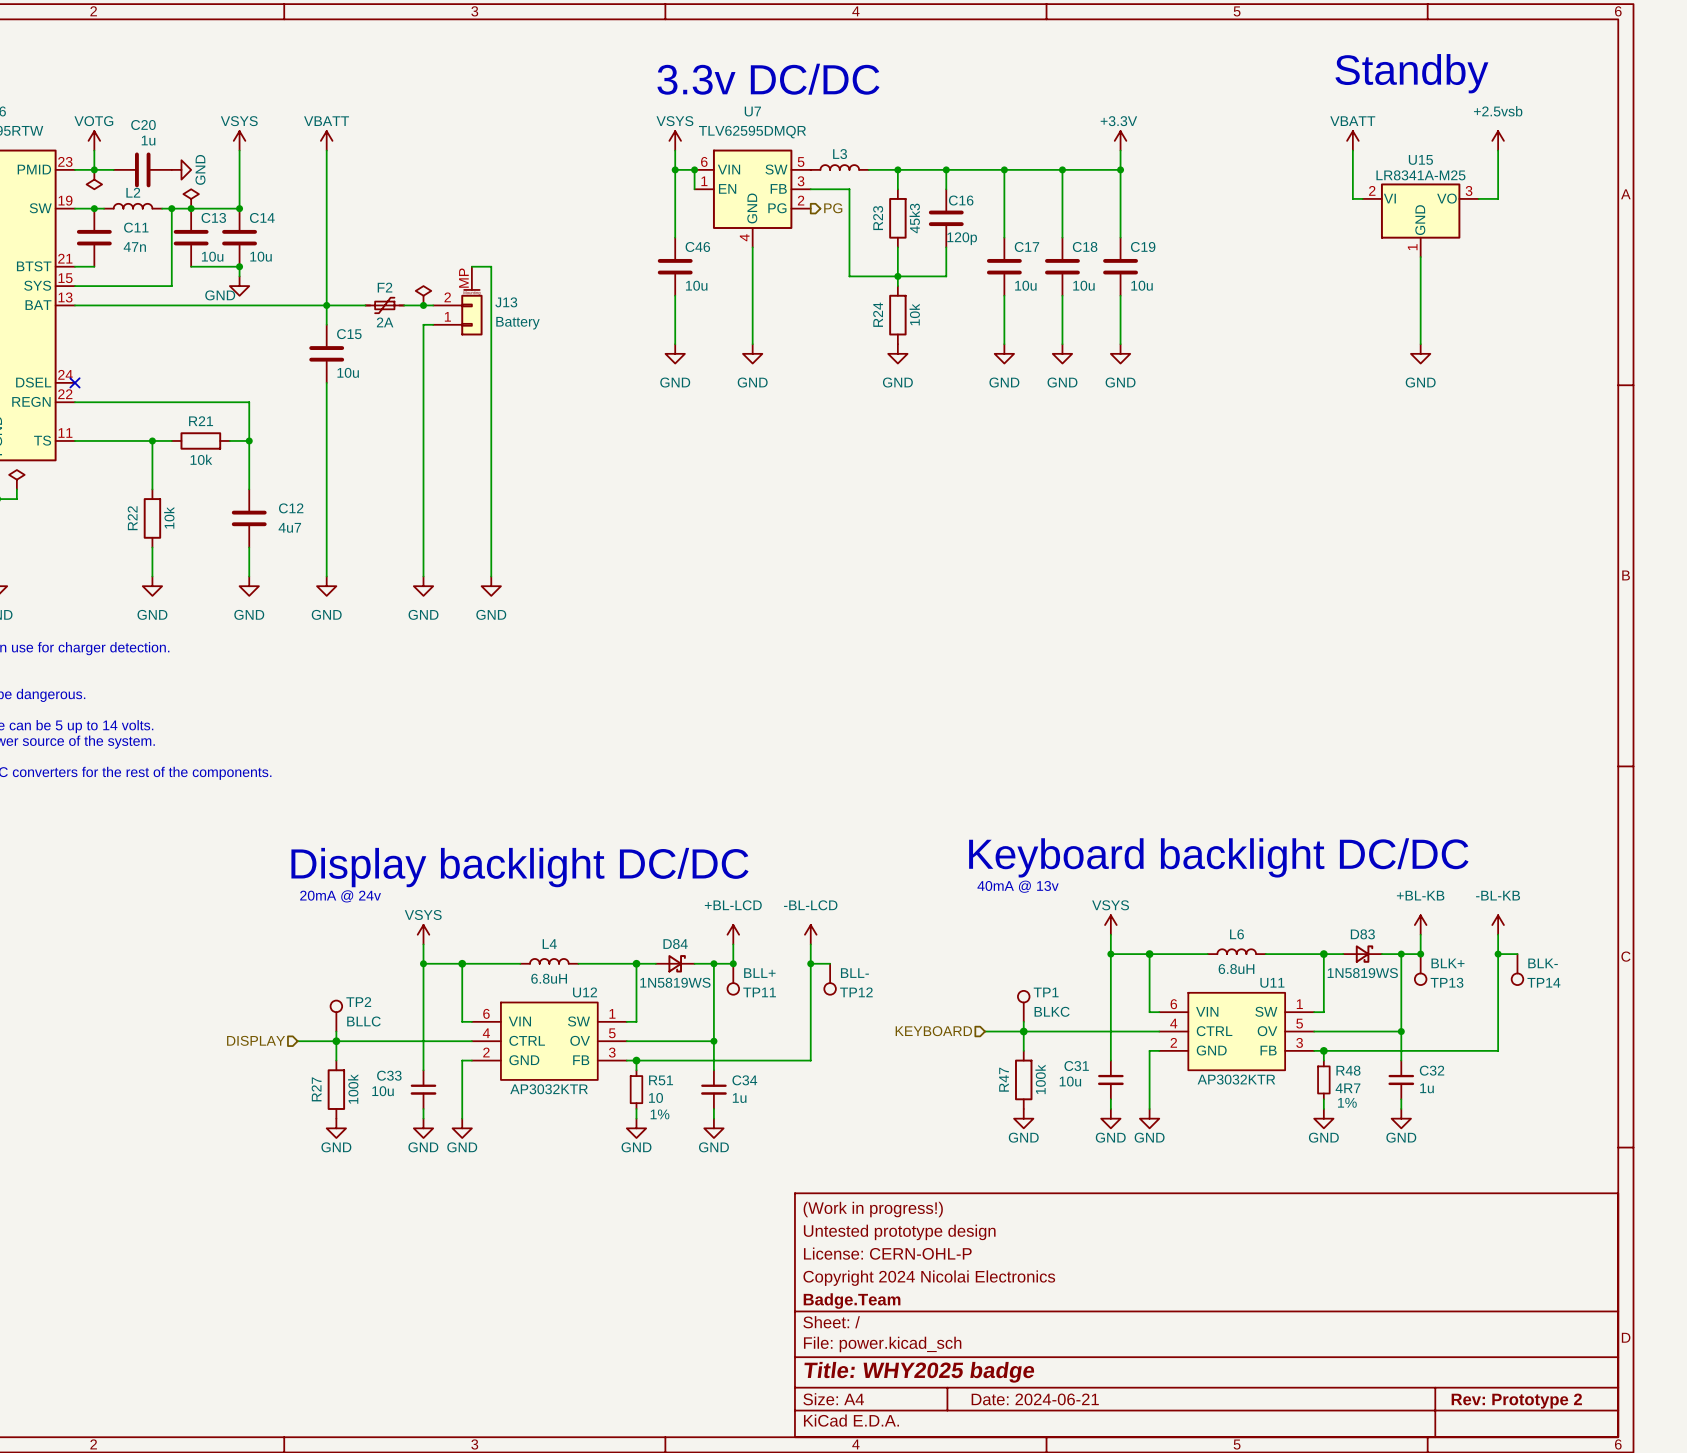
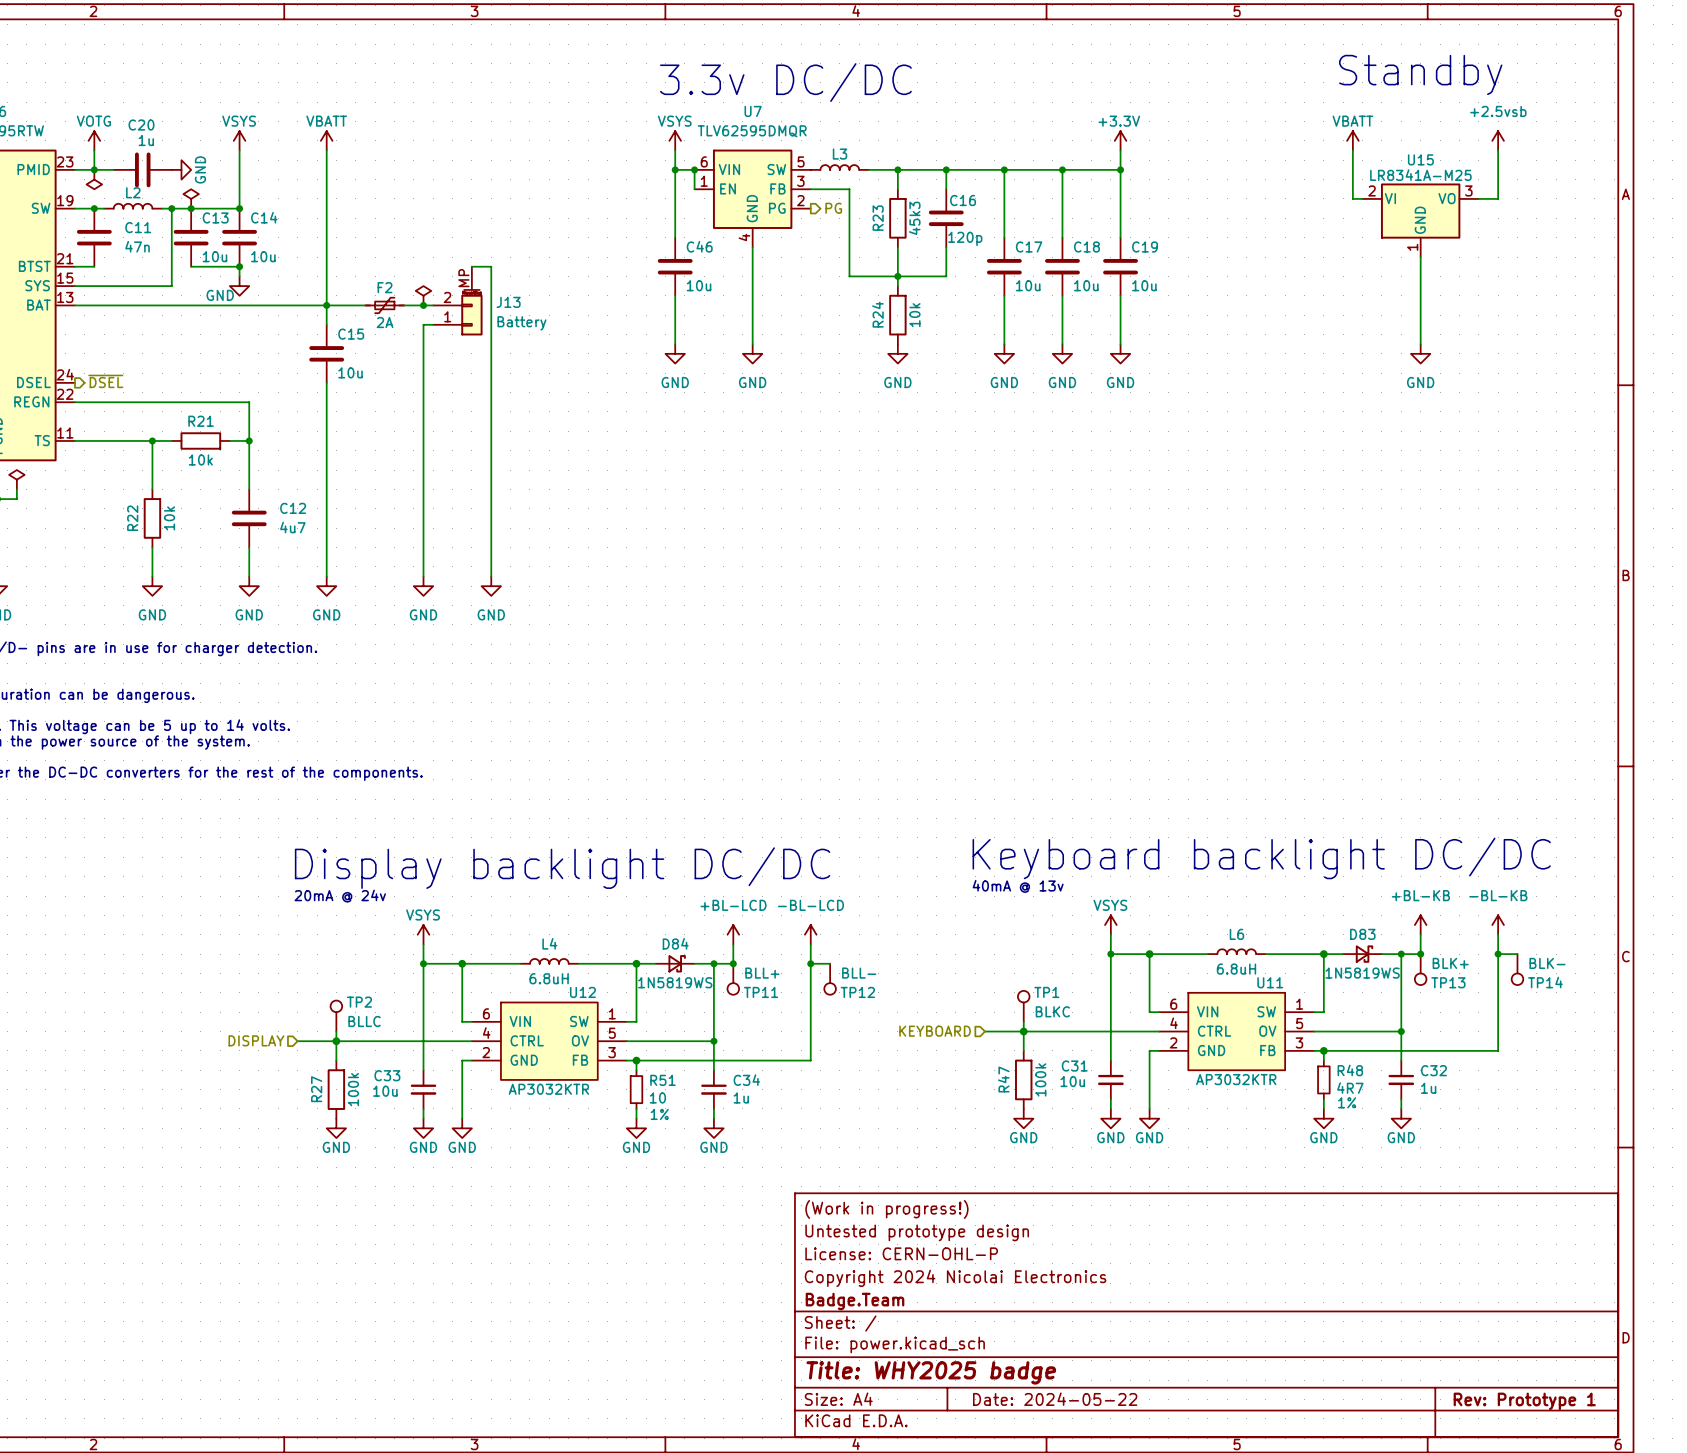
hierarchical label: none -> ~{DSEL} (105, 381)
no-connect mark: (74, 382) -> none
title block: Date: 2024-06-21 (1035, 1399) -> Date: 2024-05-22 (1055, 1399)
title block: Rev: Prototype 2 (1516, 1401) -> Rev: Prototype 1 (1524, 1401)

